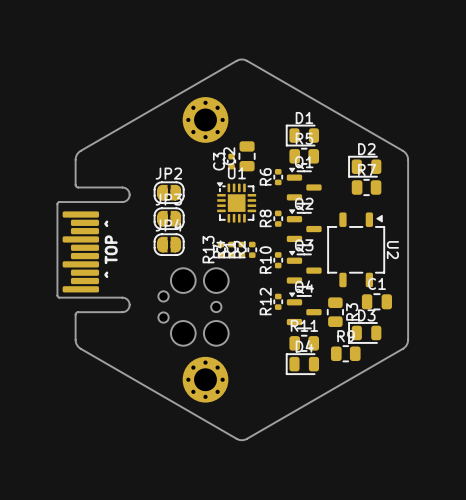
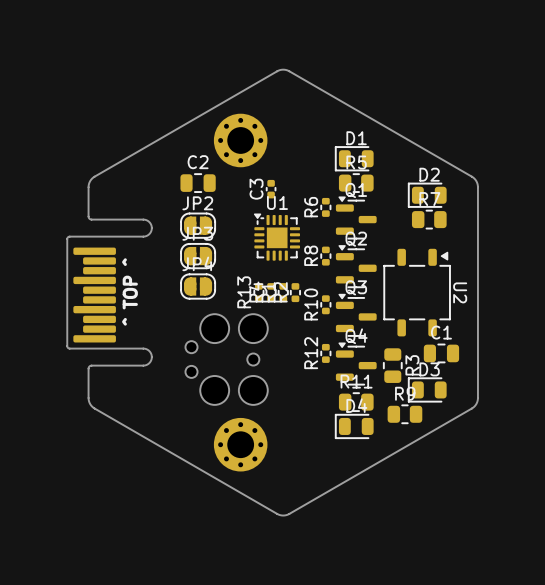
C2 rotation: 0° (247, 156) -> 90° clockwise (198, 183)
C2 position: (247, 156) -> (198, 183)

